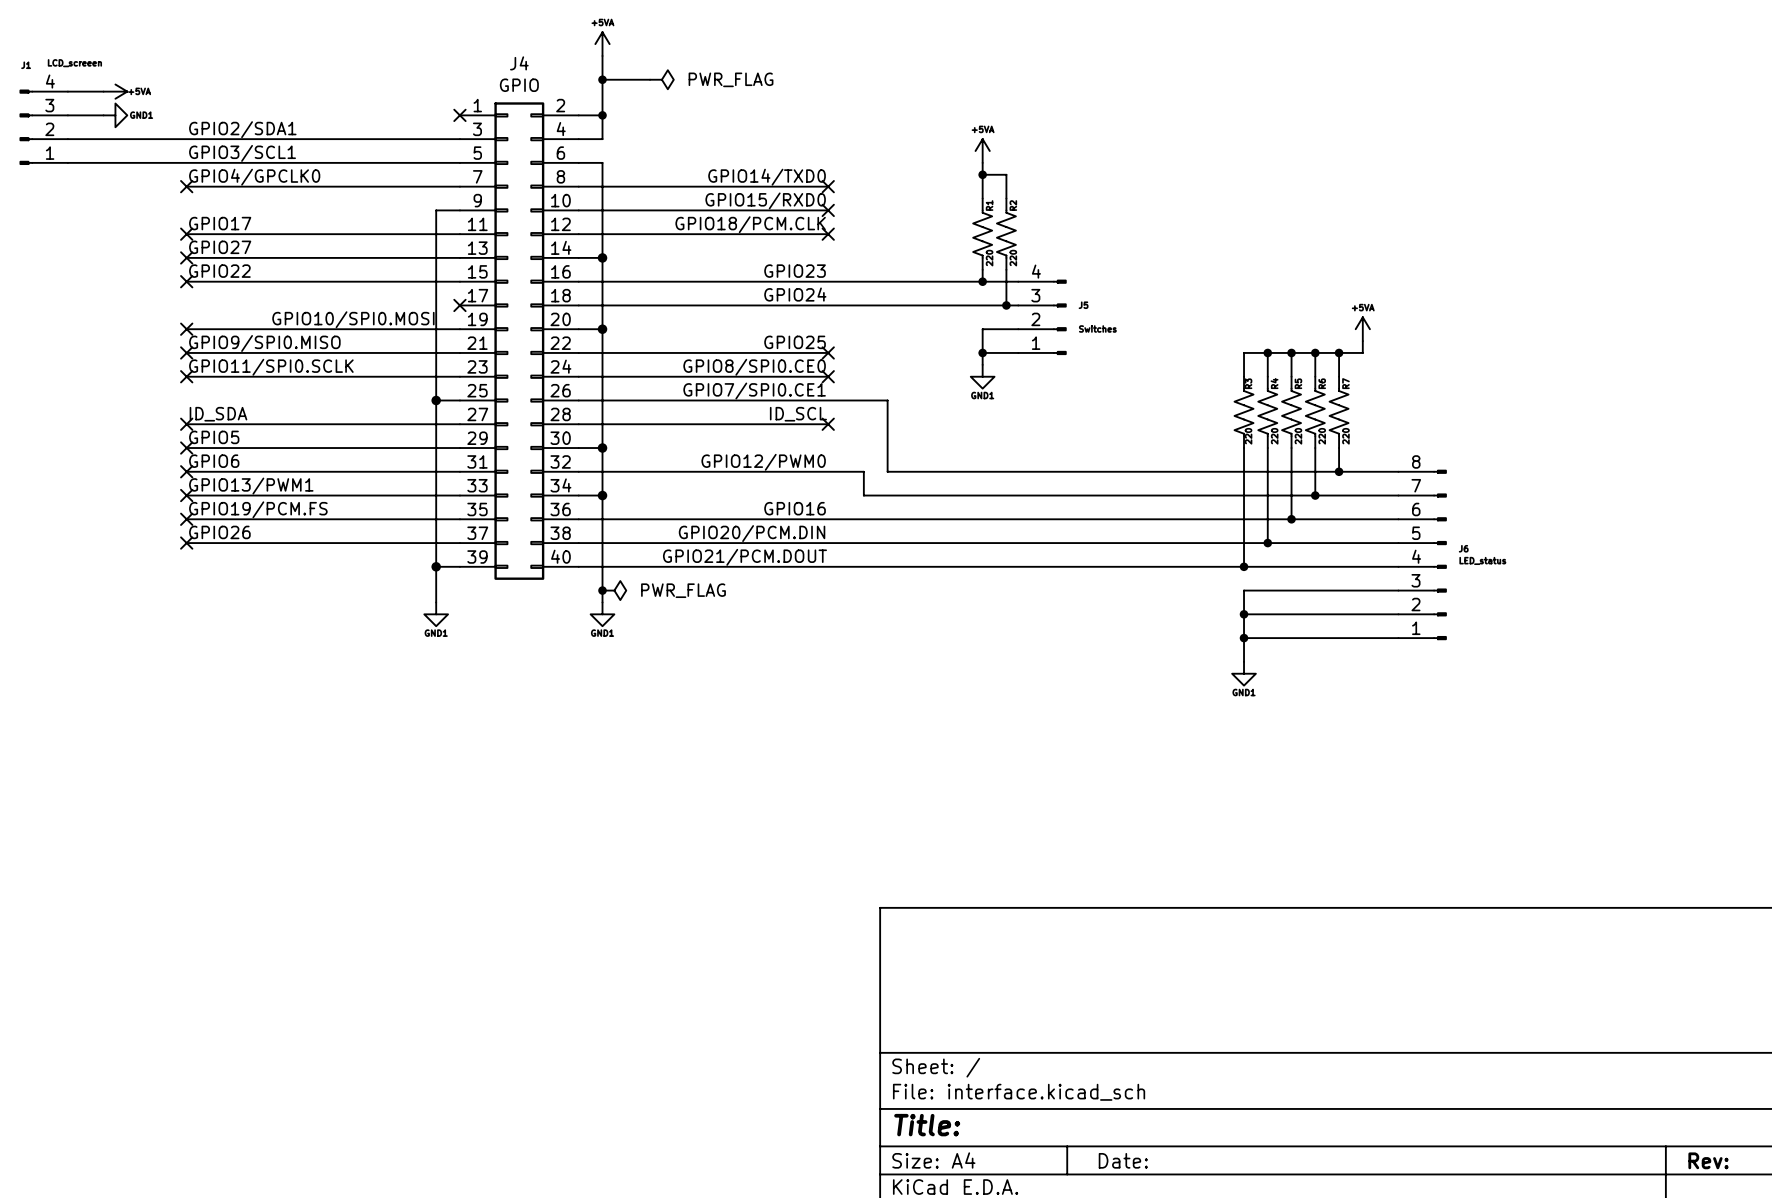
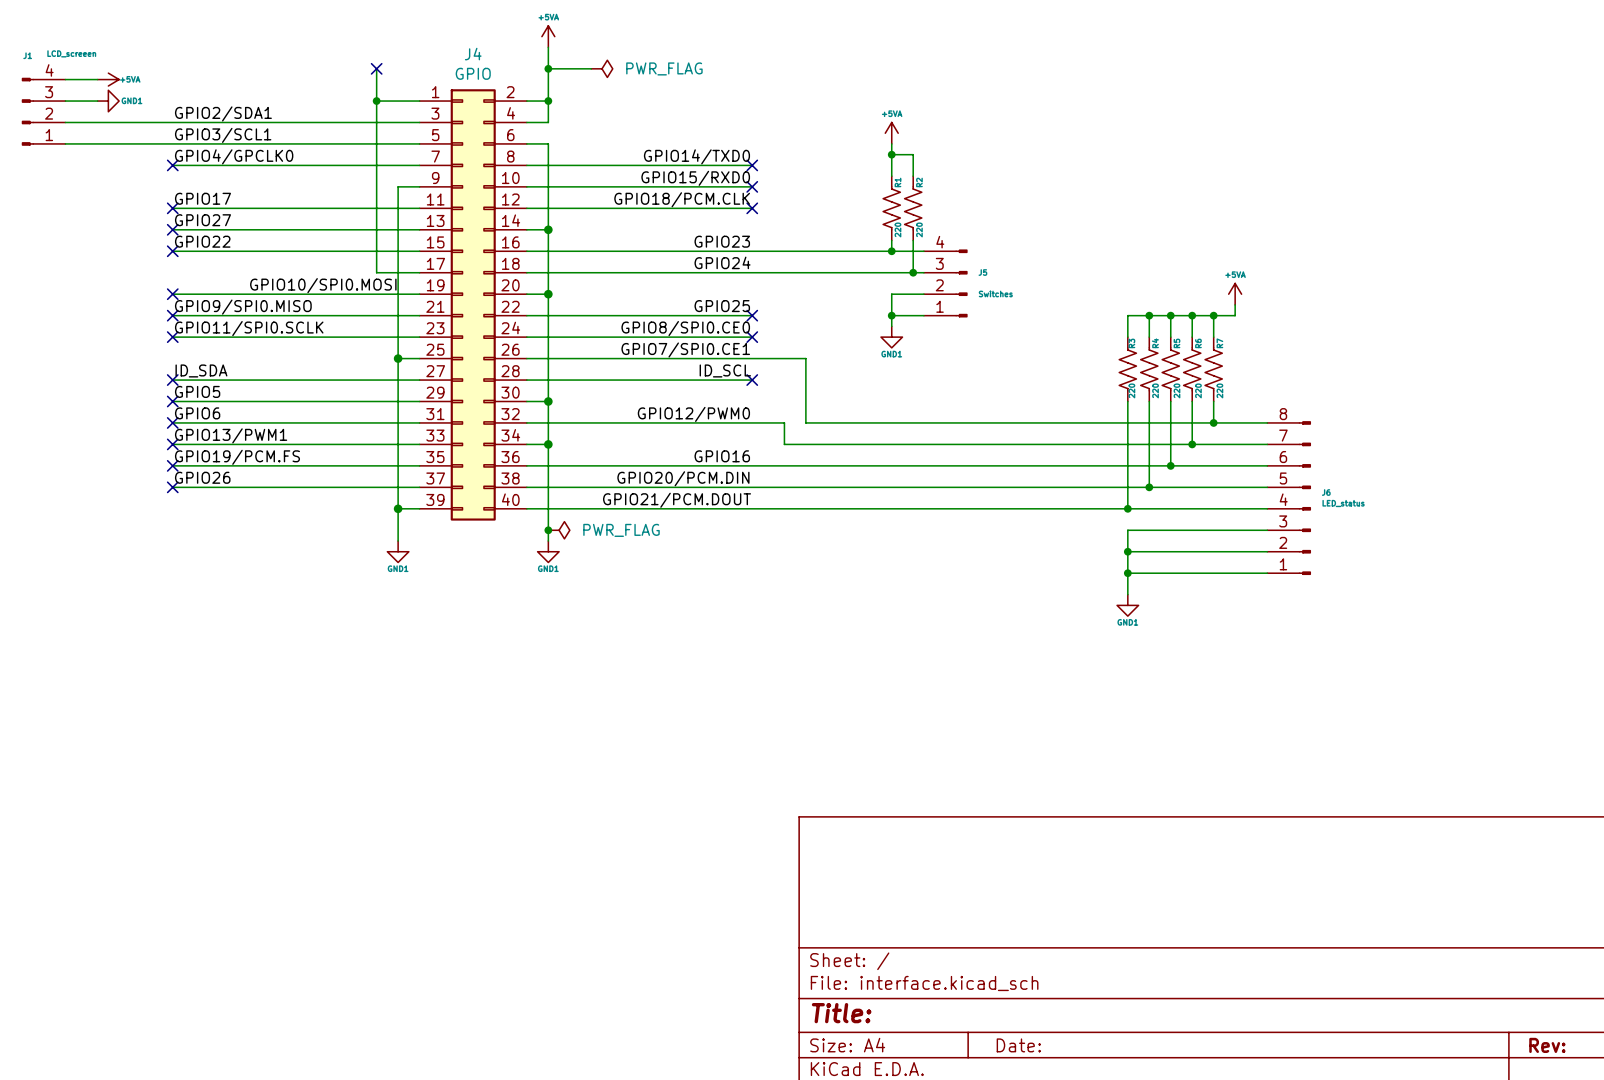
wire: none -> (376, 68) (376, 272) (419, 272)
no-connect mark: none -> (376, 68)
wire: none -> (376, 101) (419, 101)
junction: none -> (376, 101)
no-connect mark: (459, 115) -> none
no-connect mark: (459, 305) -> none

